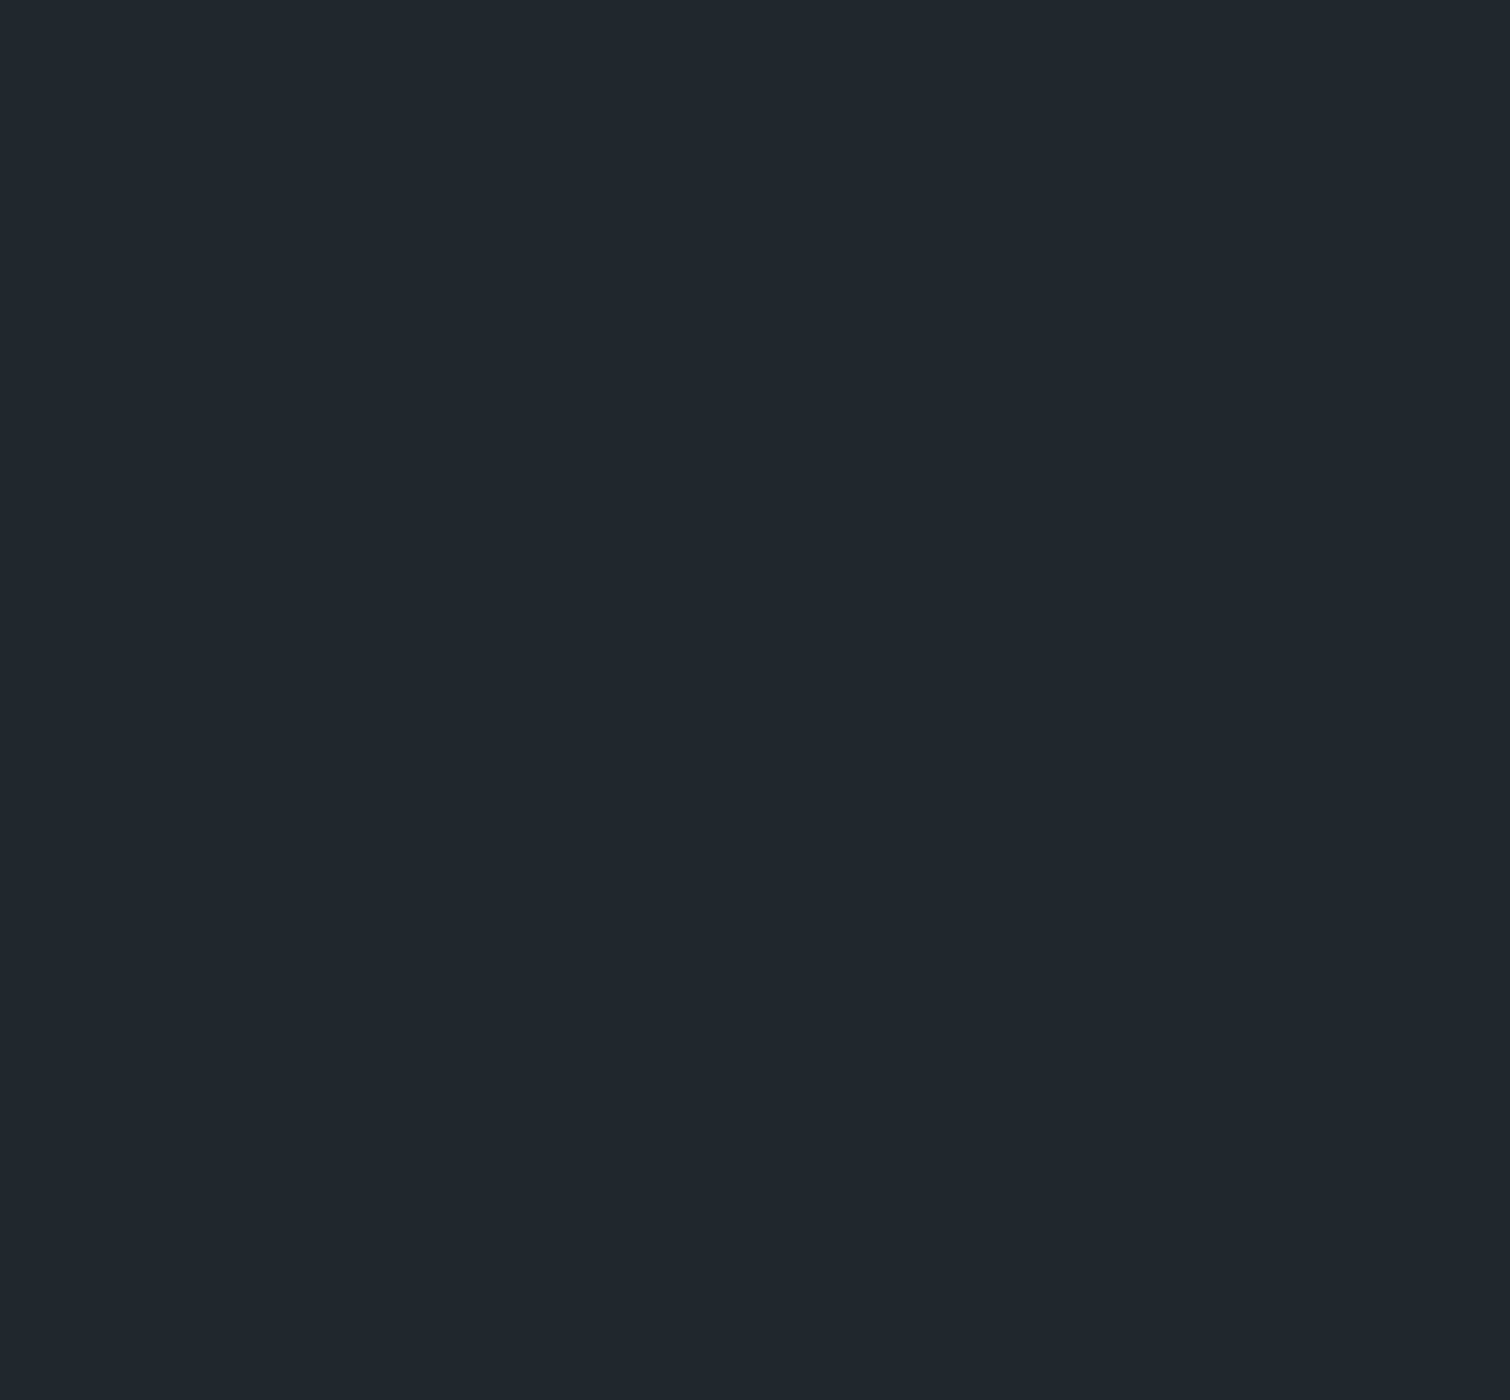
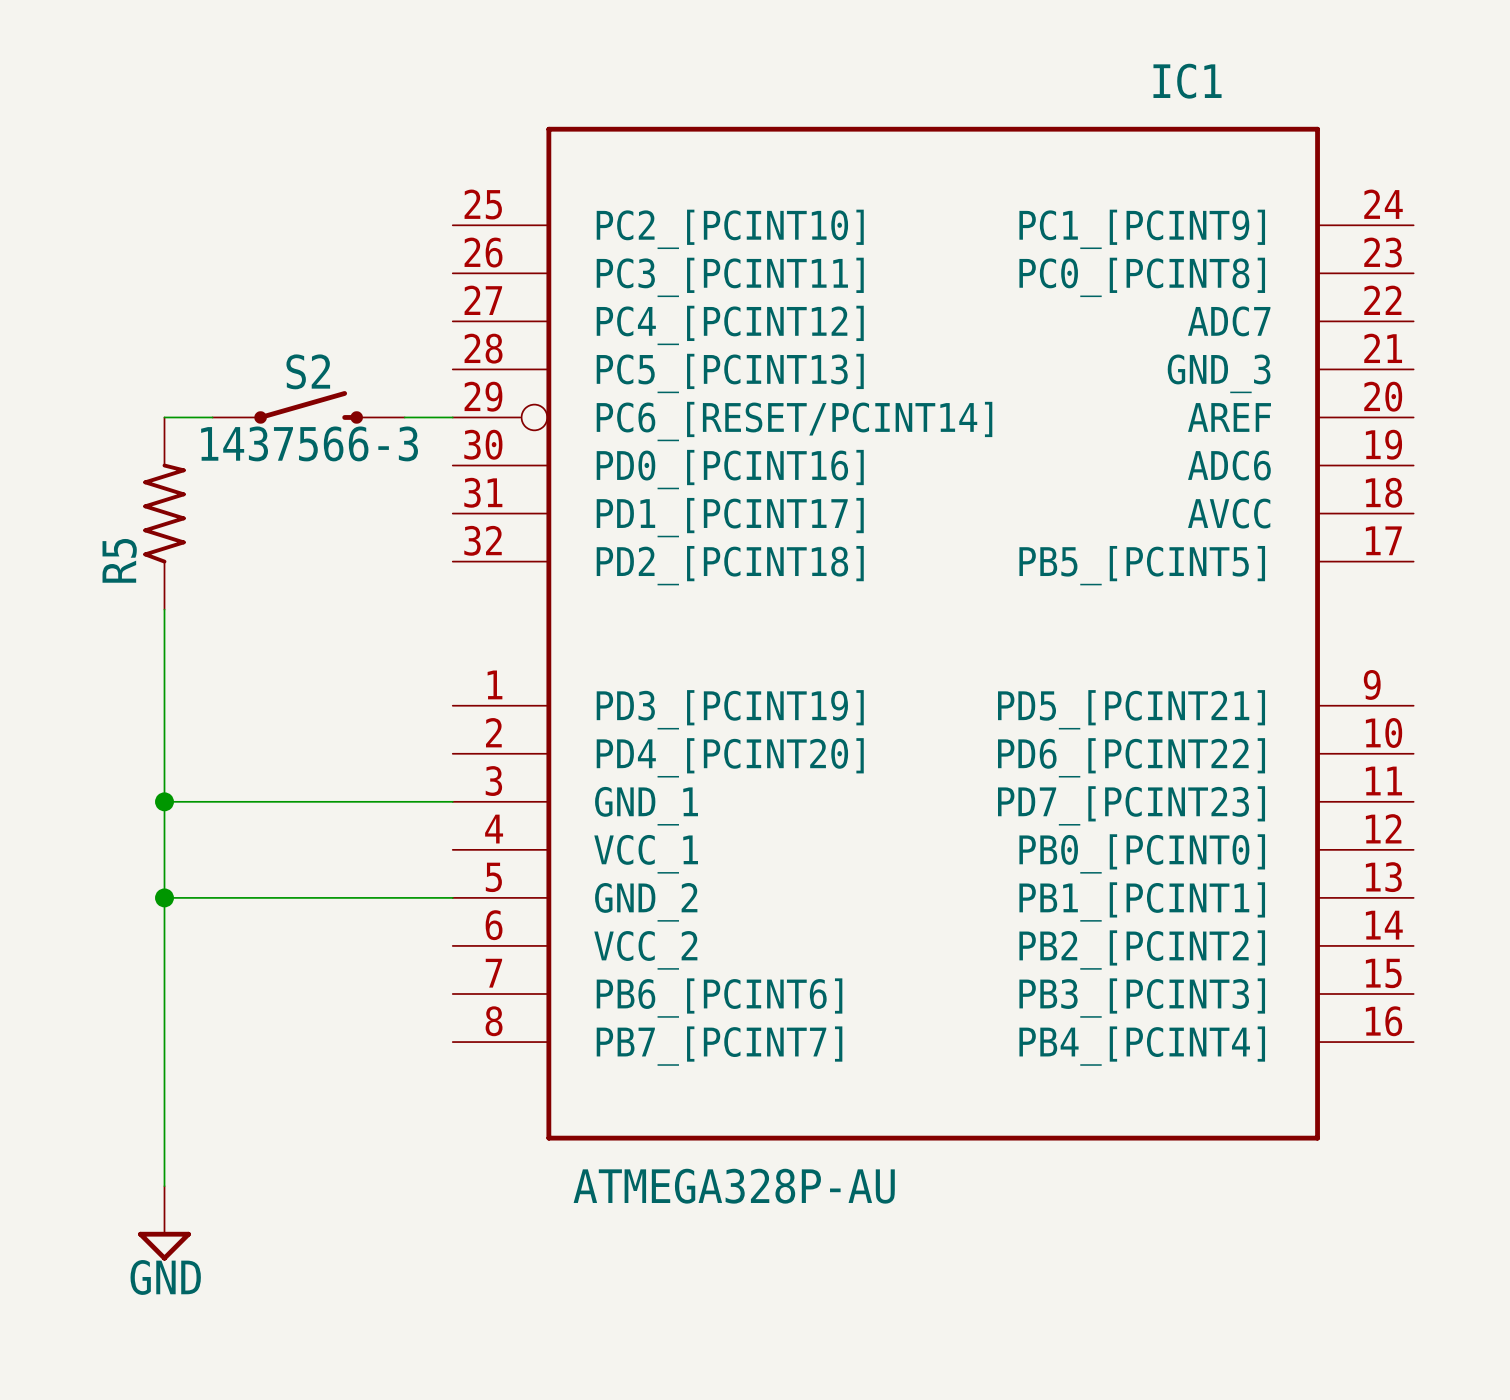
S2: none -> 1437566-3 (308, 407)
wire: none -> (164, 417) (212, 417)
wire: none -> (404, 417) (452, 417)
R5: none -> (164, 513)
wire: none -> (164, 609) (164, 1186)
IC1: none -> ATMEGA328P-AU (933, 633)
wire: none -> (164, 801) (452, 801)
junction: none -> (164, 801)
wire: none -> (164, 897) (452, 897)
junction: none -> (164, 897)
power symbol: none -> GND (164, 1223)

